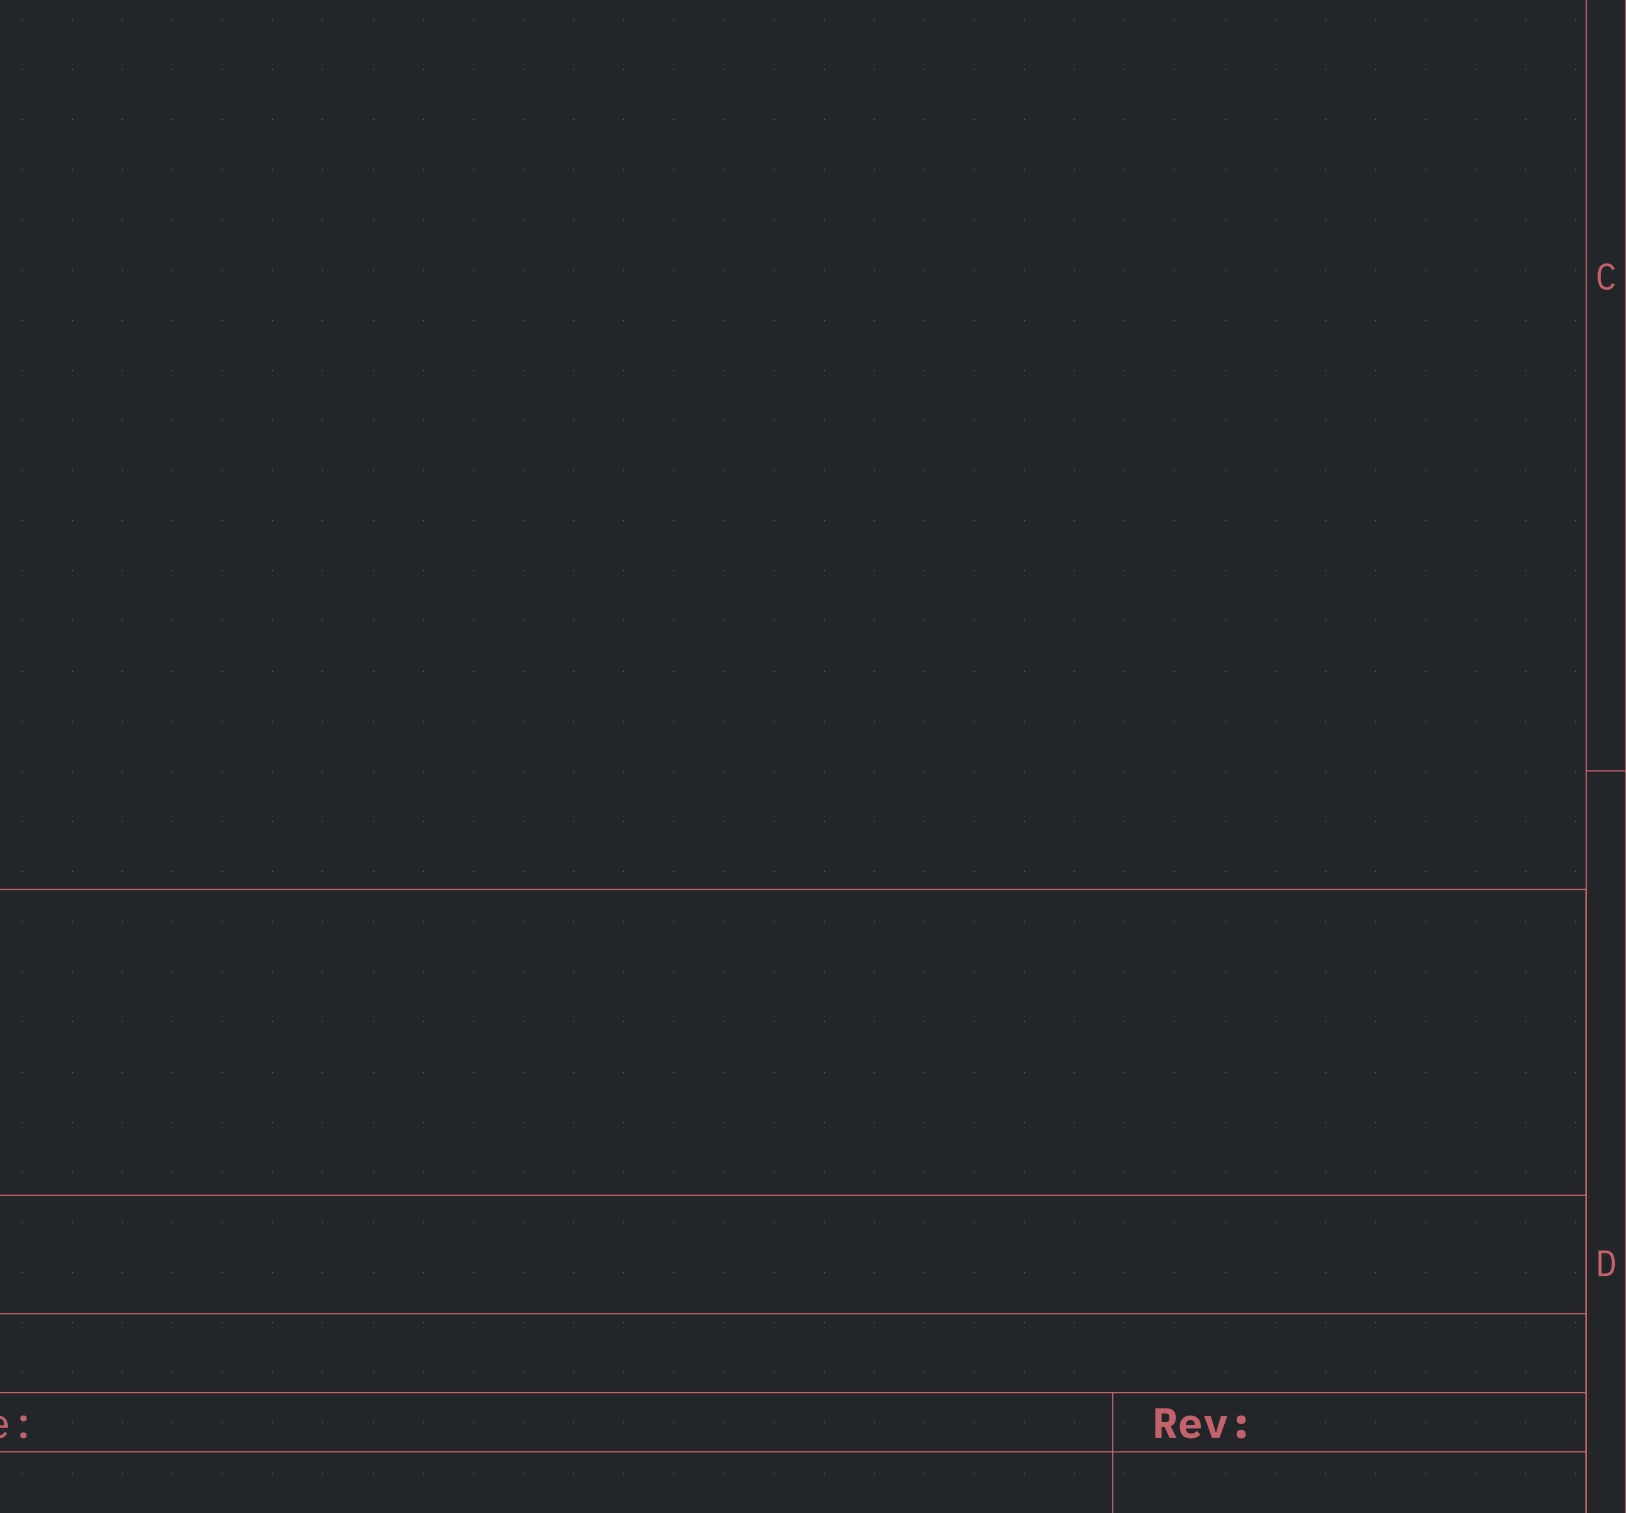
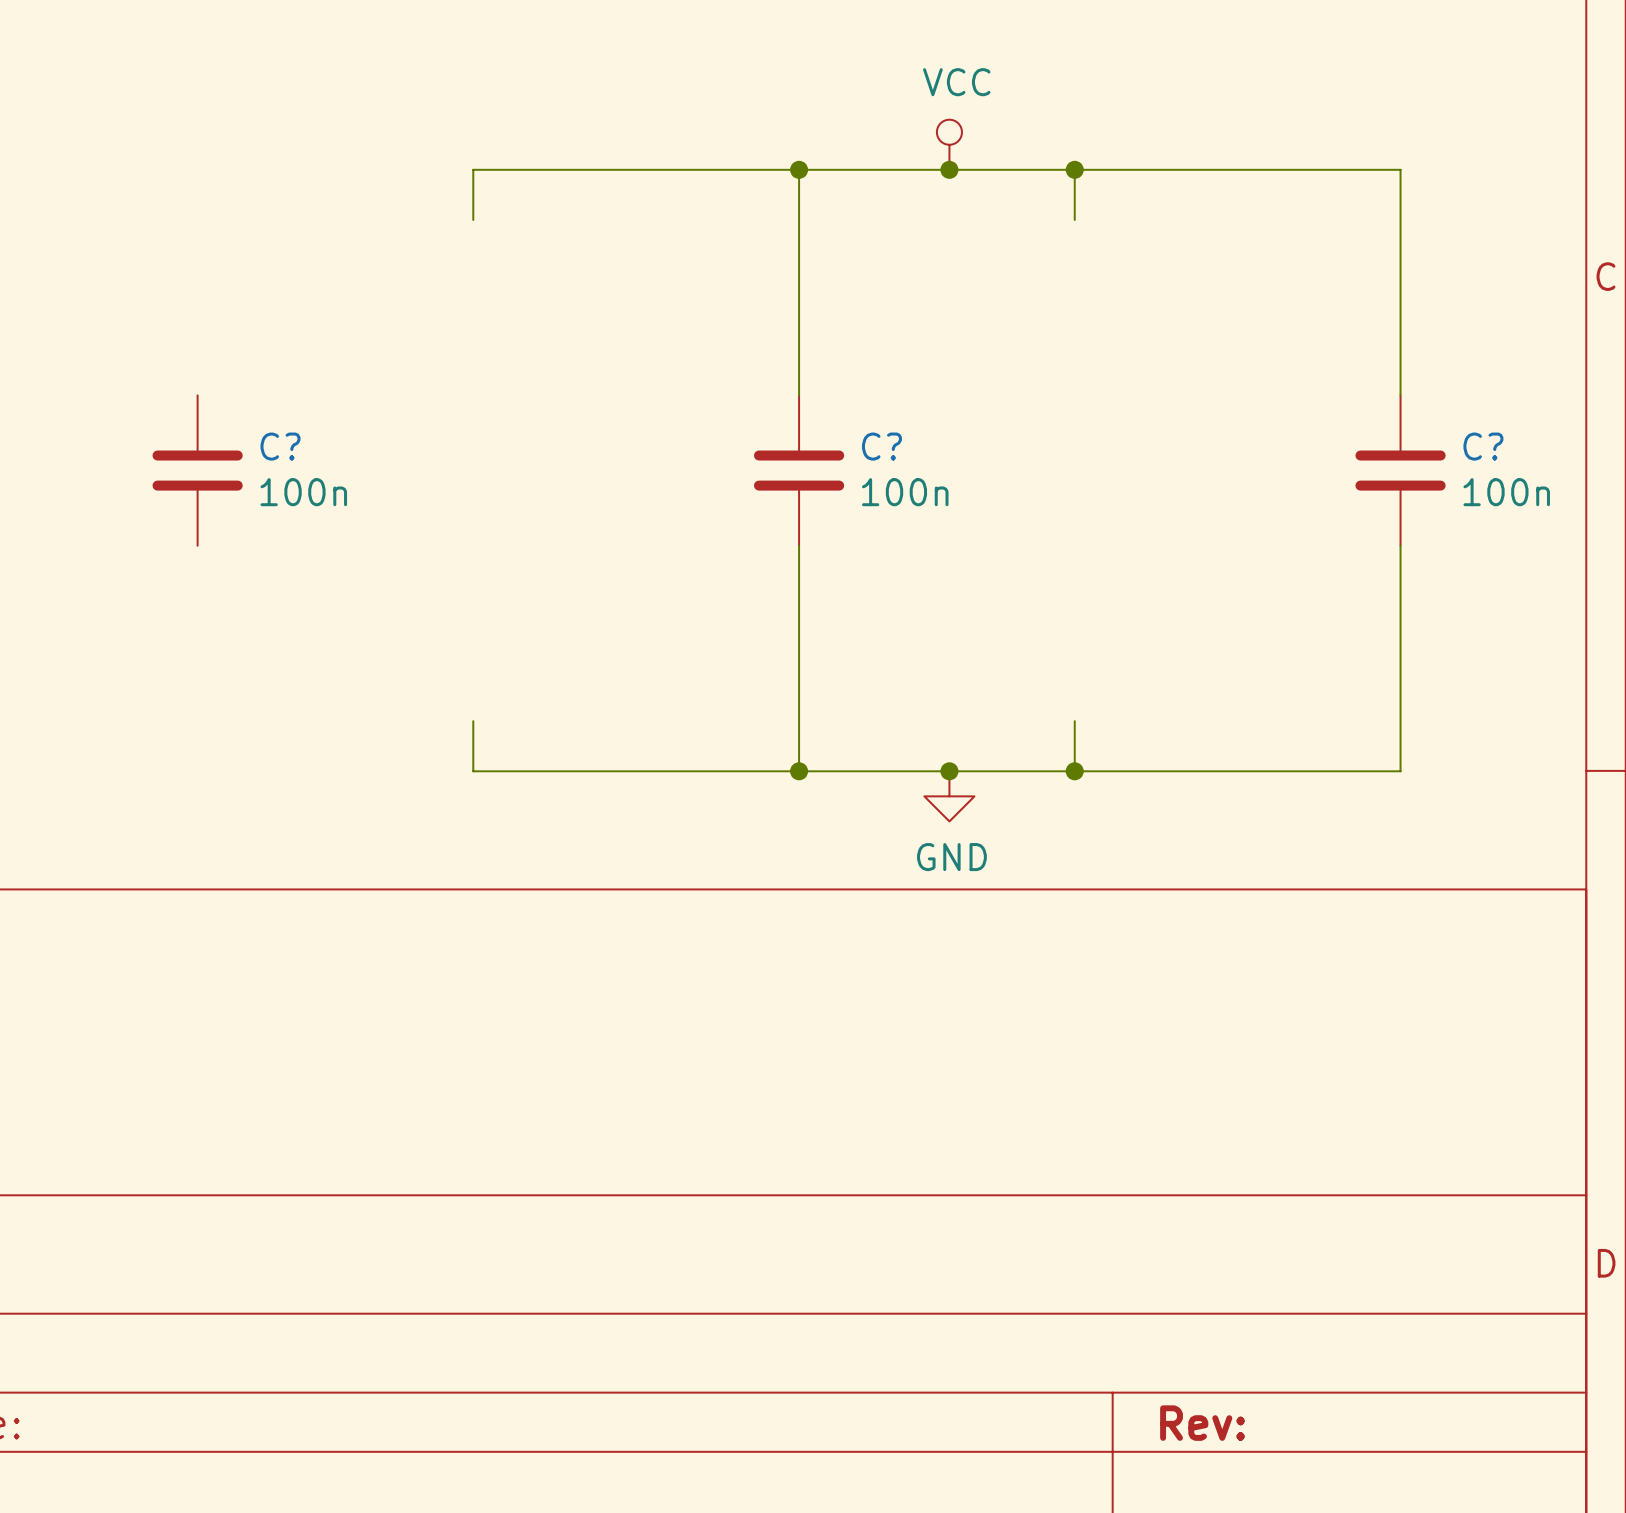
power symbol: none -> VCC (949, 144)
wire: none -> (799, 169) (799, 395)
junction: none -> (799, 169)
junction: none -> (949, 169)
wire: none -> (1074, 169) (1074, 219)
junction: none -> (1074, 169)
wire: none -> (473, 219) (473, 169) (1400, 169) (1400, 395)
C?: none -> 100n (197, 470)
C?: none -> 100n (799, 470)
C?: none -> 100n (1400, 470)
wire: none -> (799, 545) (799, 771)
wire: none -> (1400, 545) (1400, 771) (473, 771) (473, 721)
wire: none -> (1074, 721) (1074, 771)
junction: none -> (799, 771)
junction: none -> (949, 771)
junction: none -> (1074, 771)
power symbol: none -> GND (949, 796)

